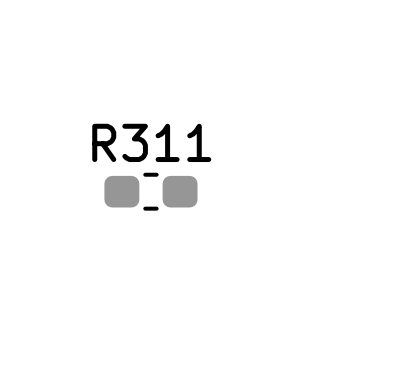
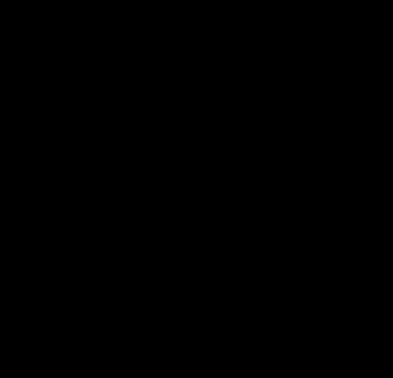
R311: (150, 191) -> none

